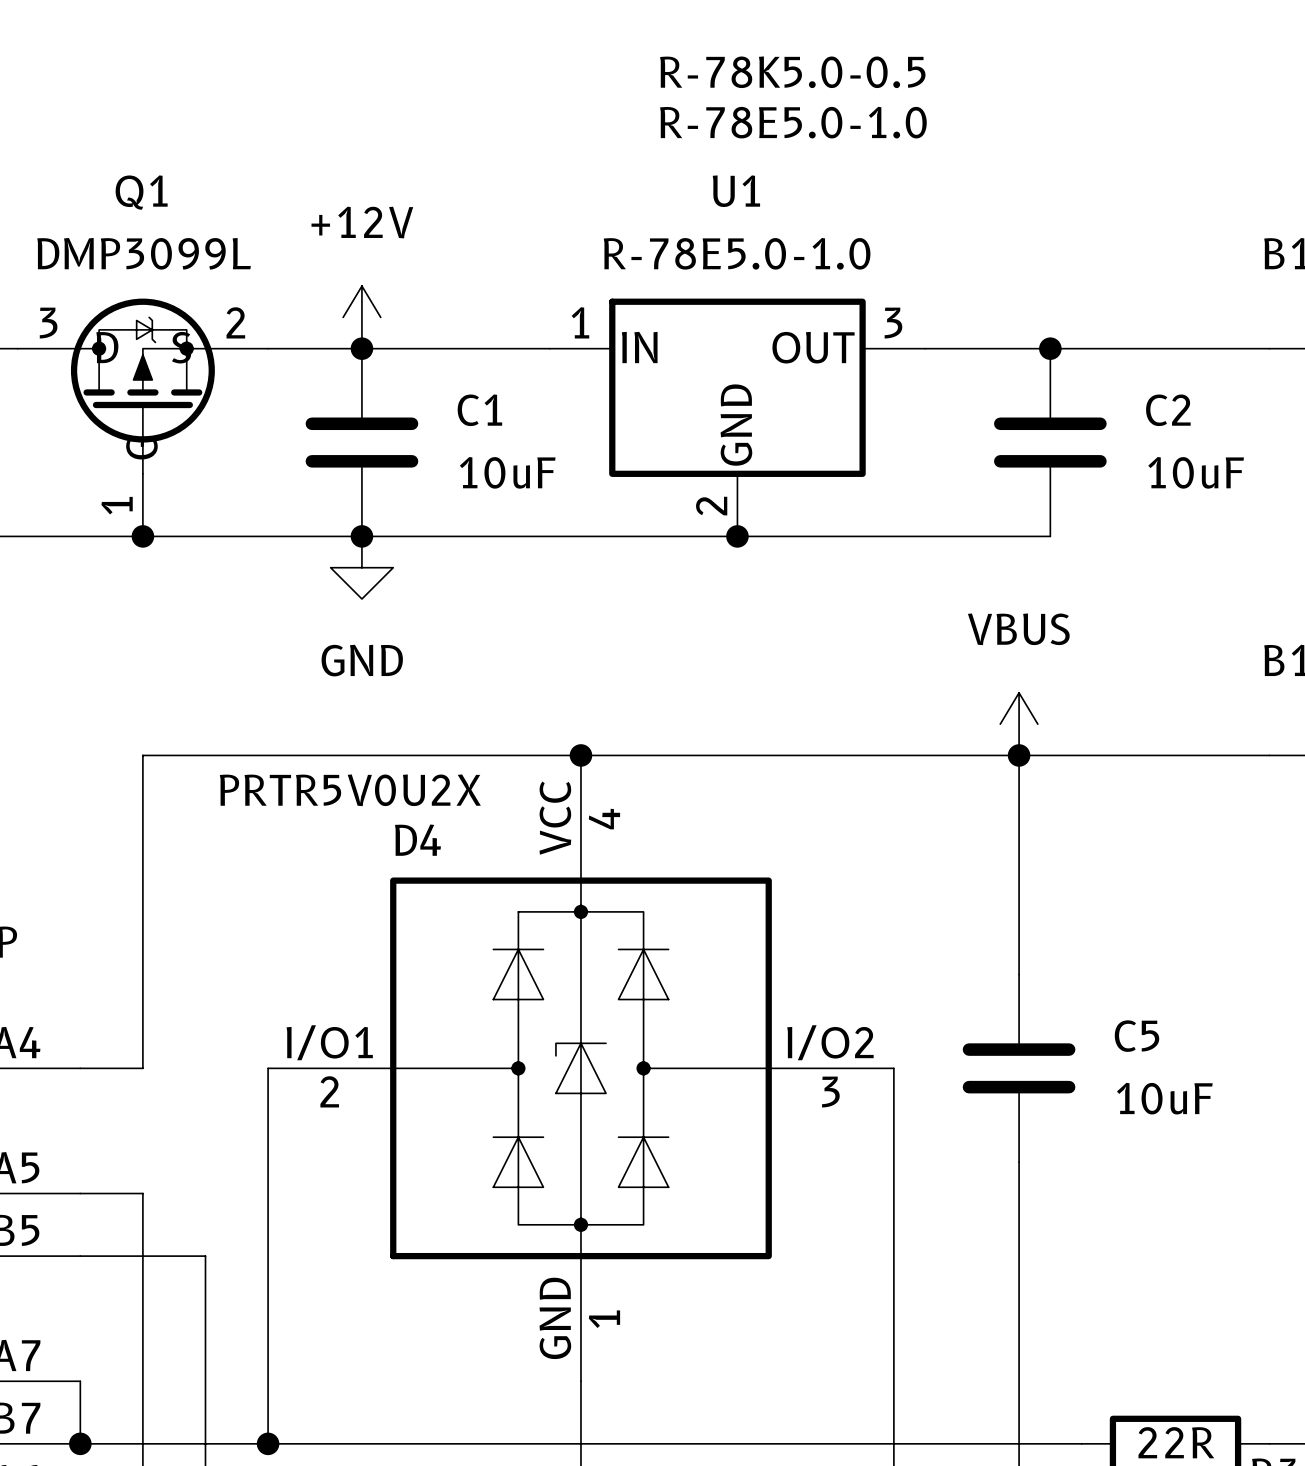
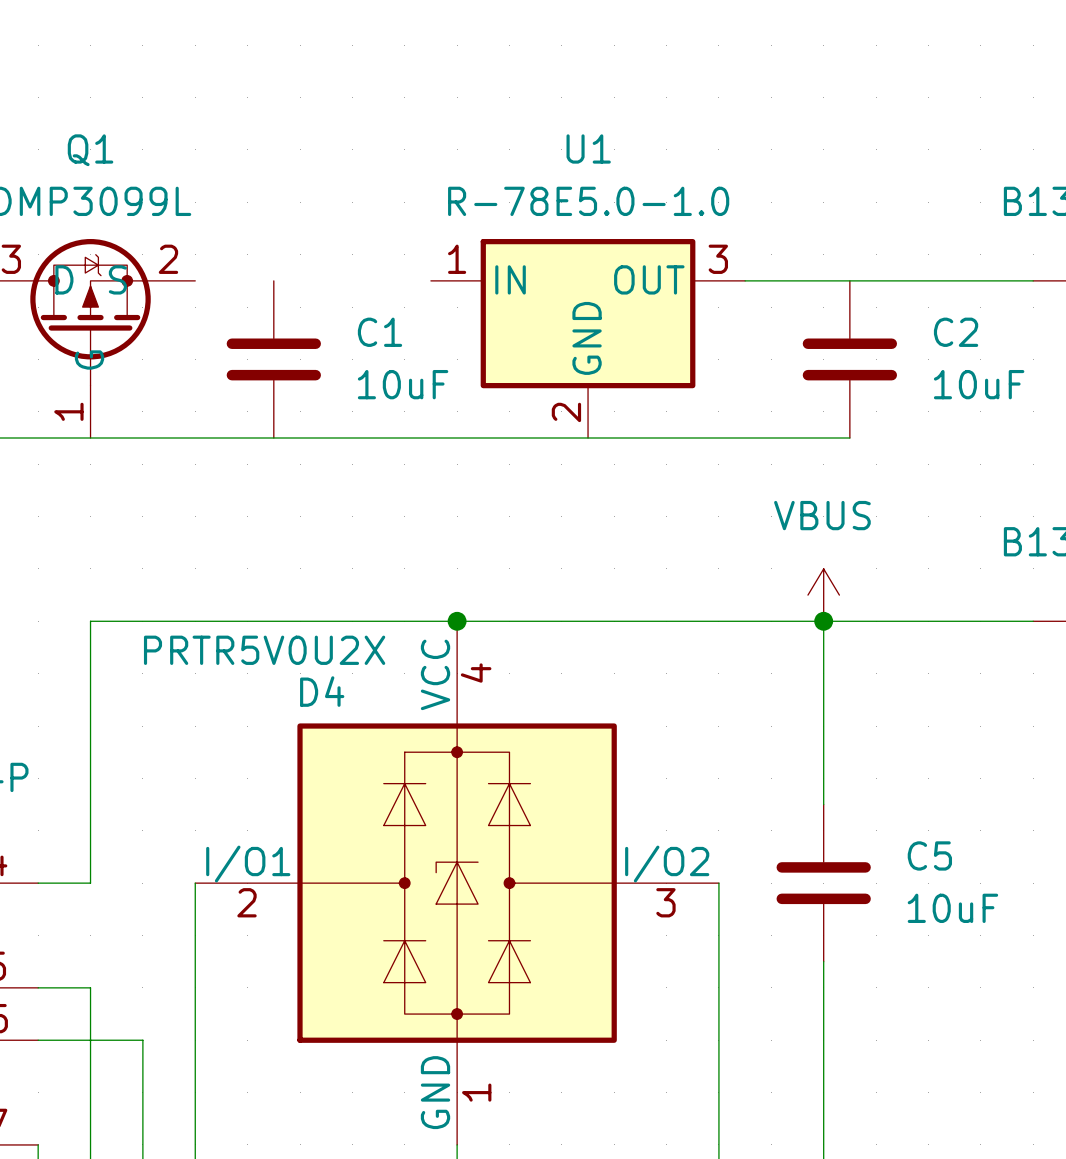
text: R-78K5.0-0.5 (792, 72) -> none
text: R-78E5.0-1.0 (793, 122) -> none
power symbol: +12V (361, 317) -> none
wire: (268, 348) (549, 348) -> none
junction: (361, 348) -> none
junction: (1050, 348) -> none
junction: (142, 536) -> none
junction: (361, 536) -> none
junction: (737, 536) -> none
power symbol: GND (361, 567) -> none

